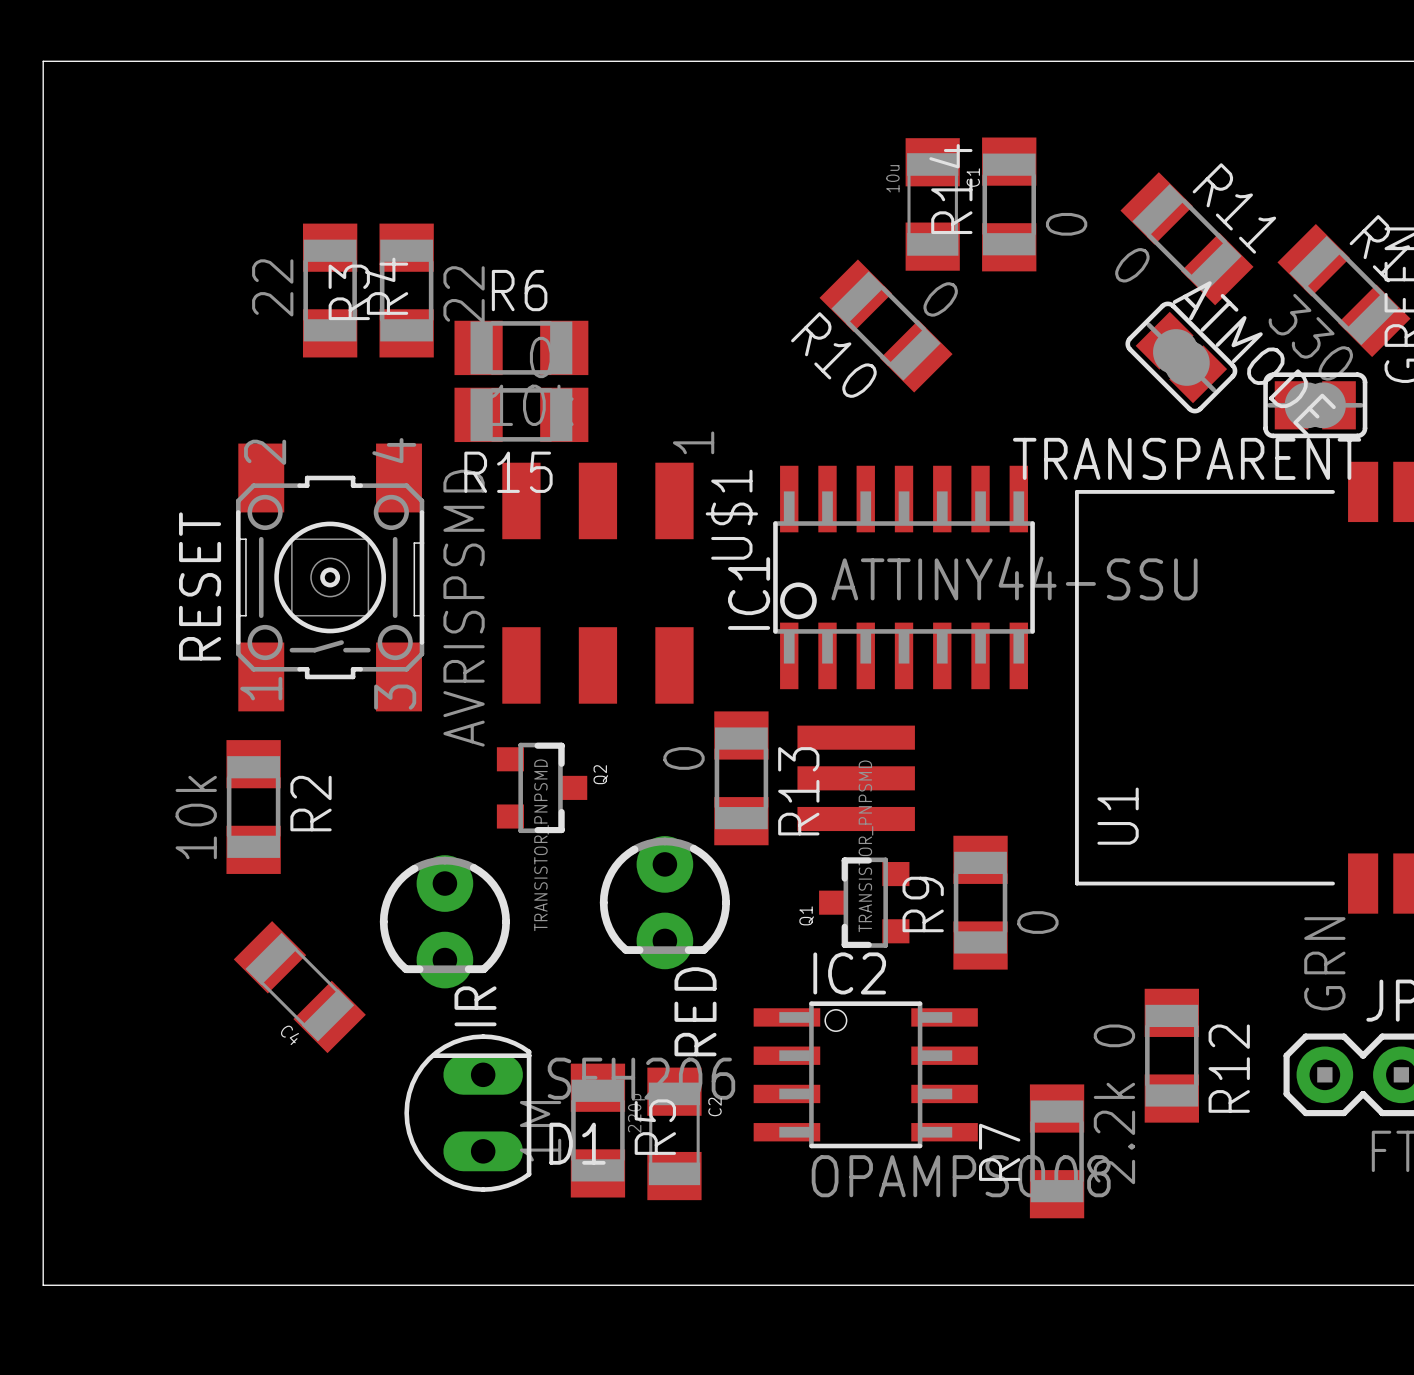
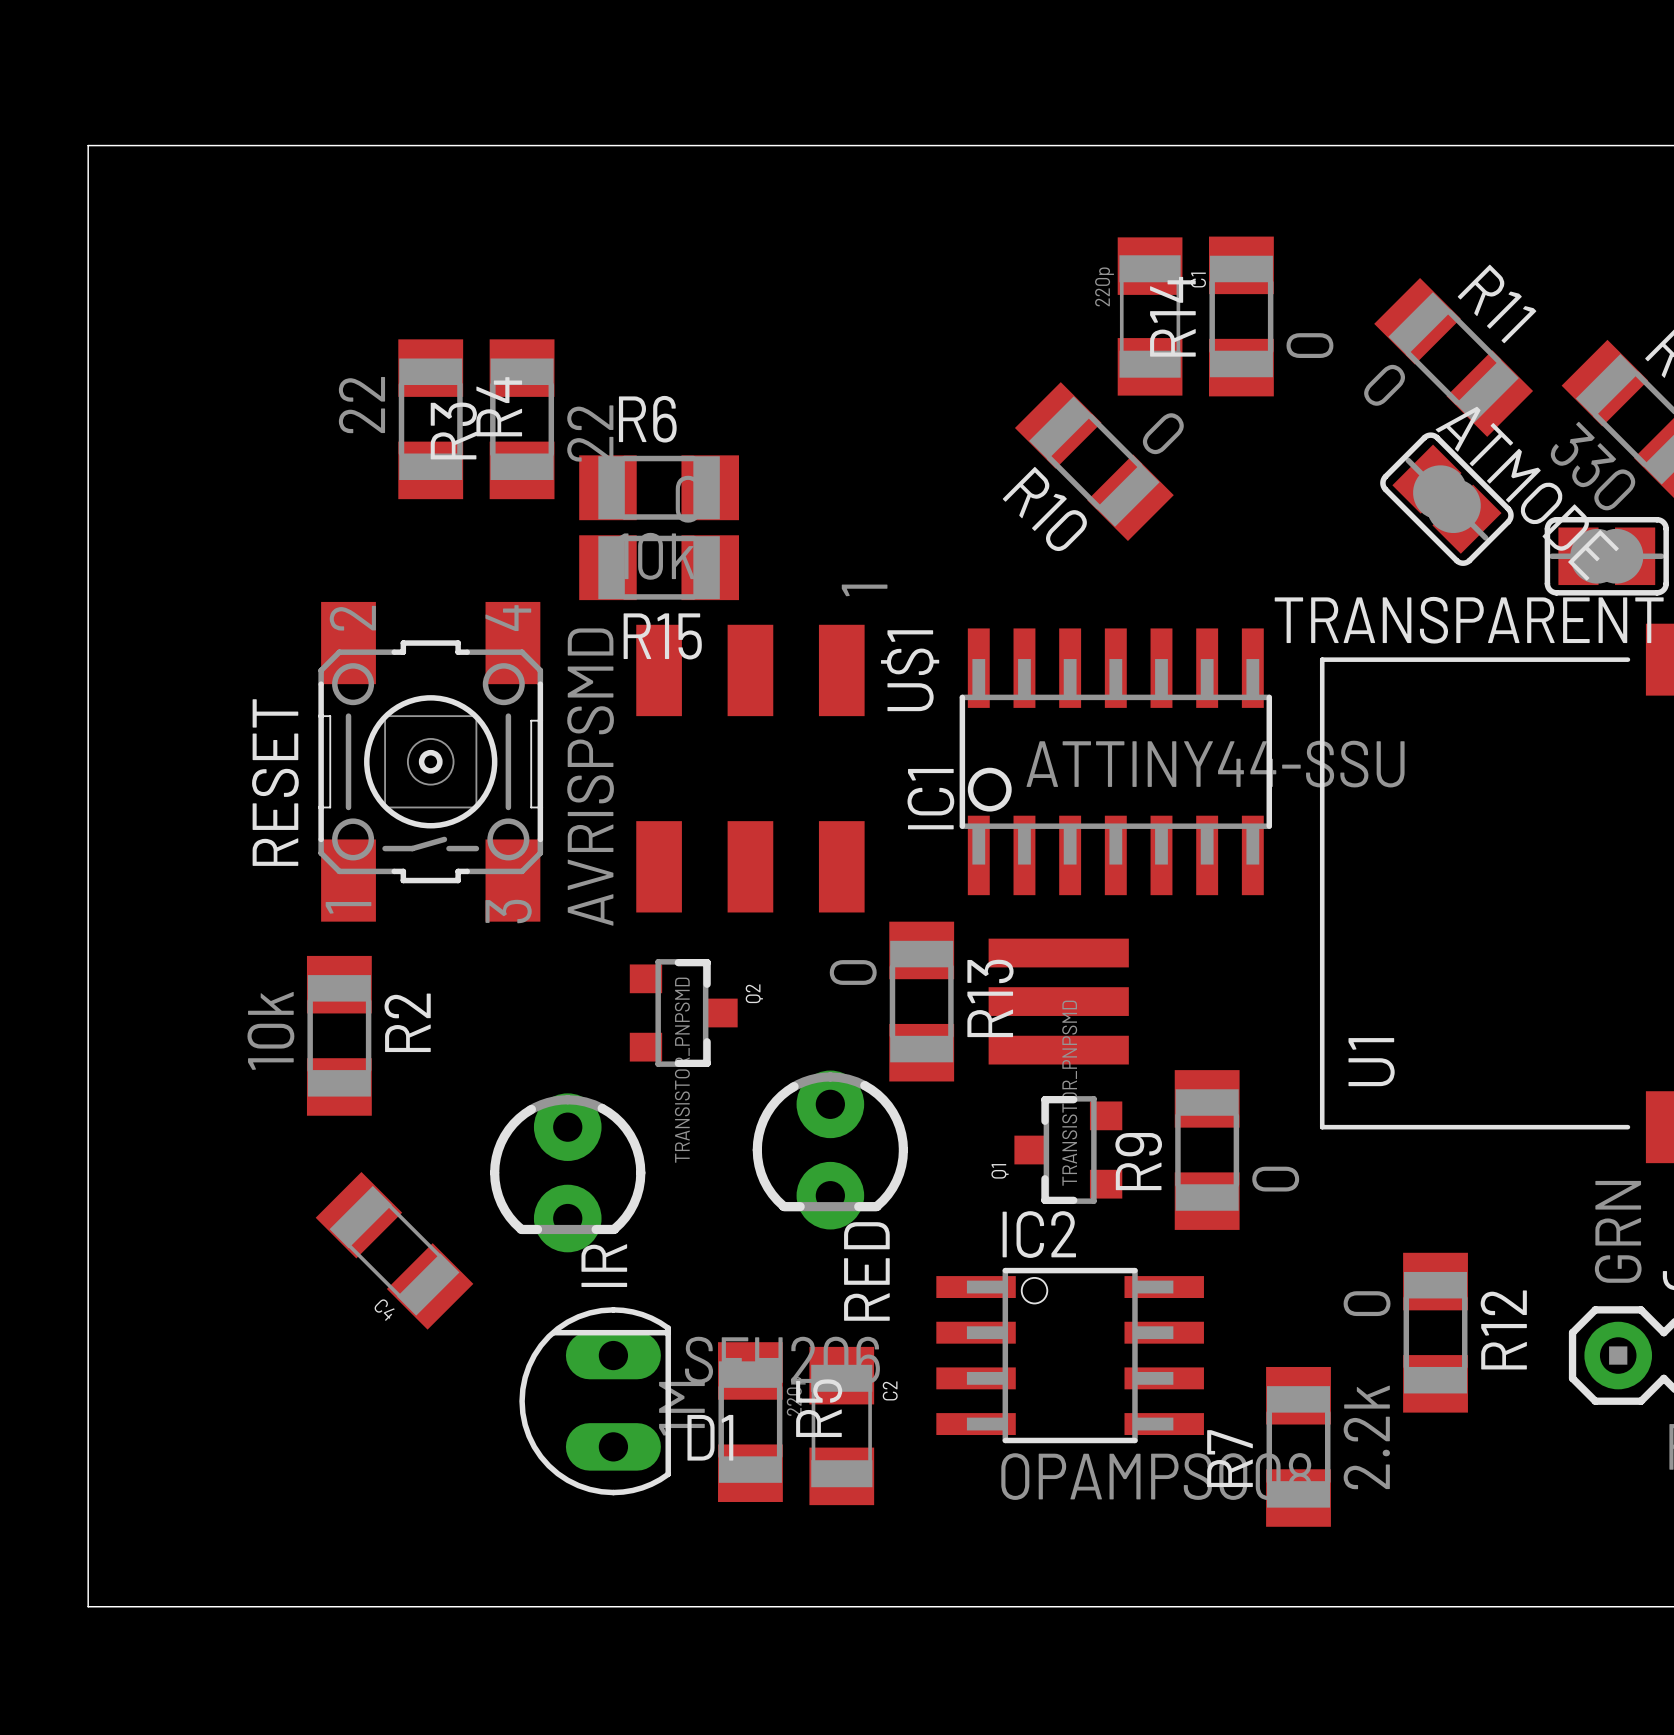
C1 value: 10u (892, 178) -> 220p (1104, 286)

